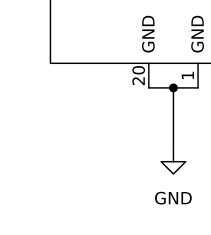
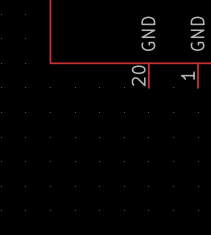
wire: (148, 87) (198, 87) -> none
wire: (173, 87) (173, 149) -> none
junction: (173, 87) -> none
power symbol: GND (173, 161) -> none

